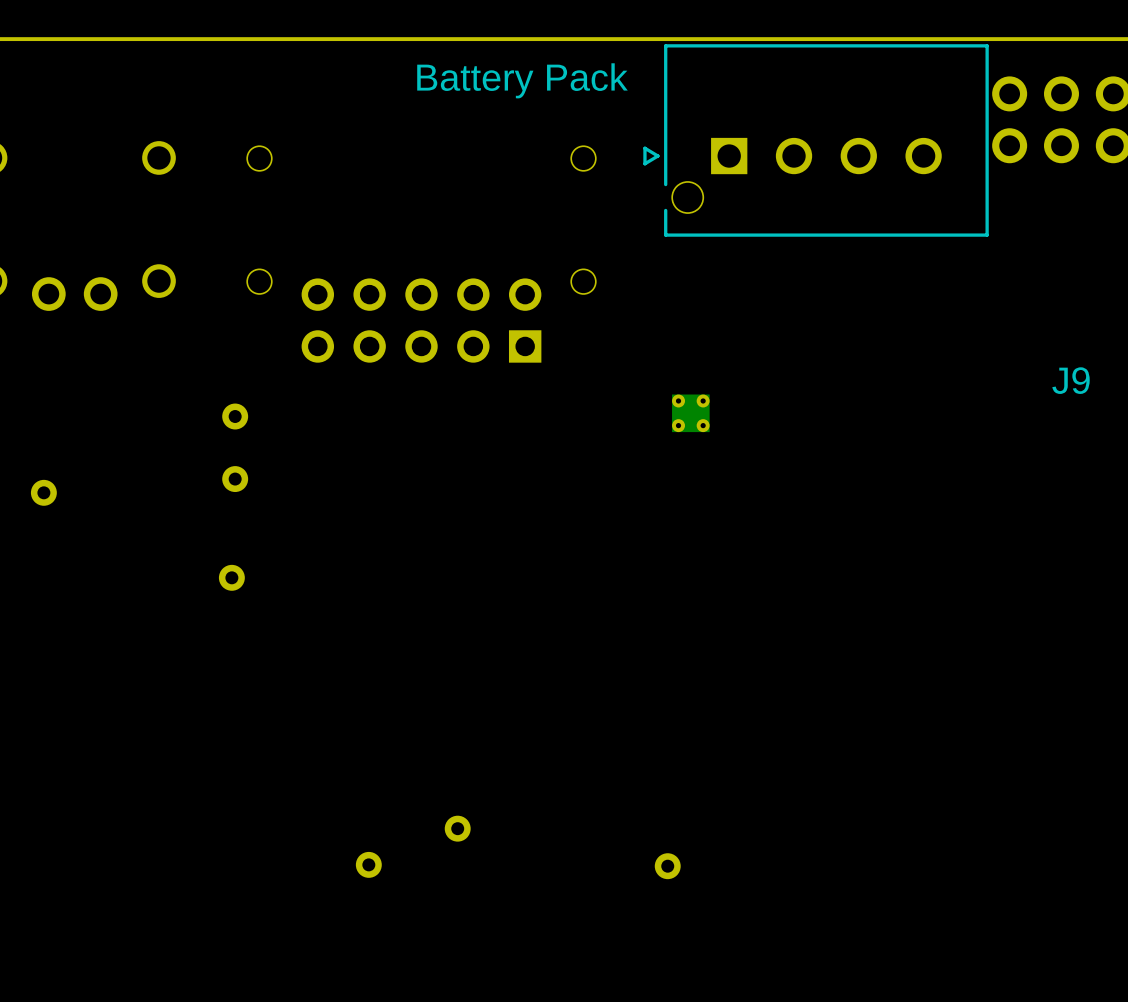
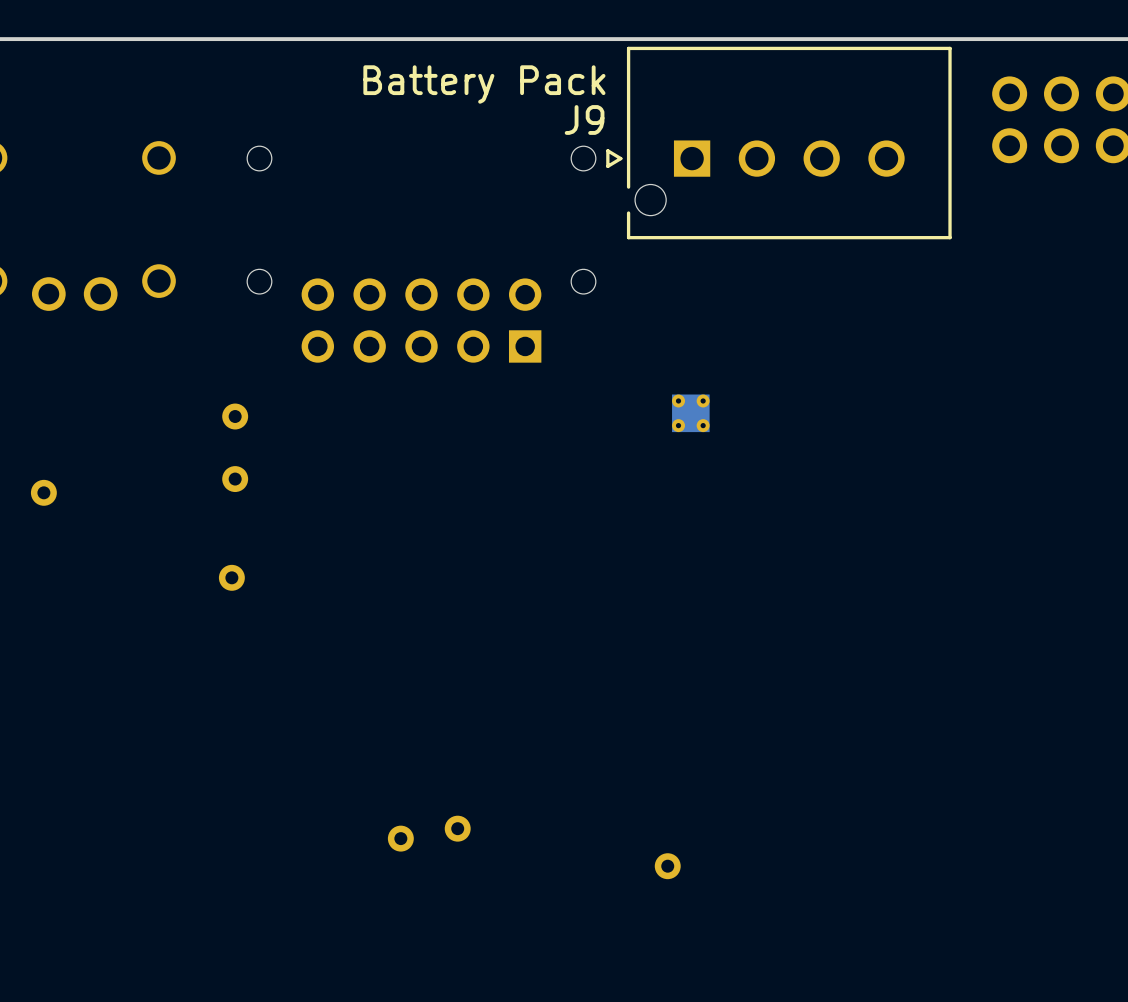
J9 position: (816, 140) -> (778, 143)
J9 name position: J9 (1071, 380) -> J9 (584, 119)
part position: (368, 864) -> (400, 838)

